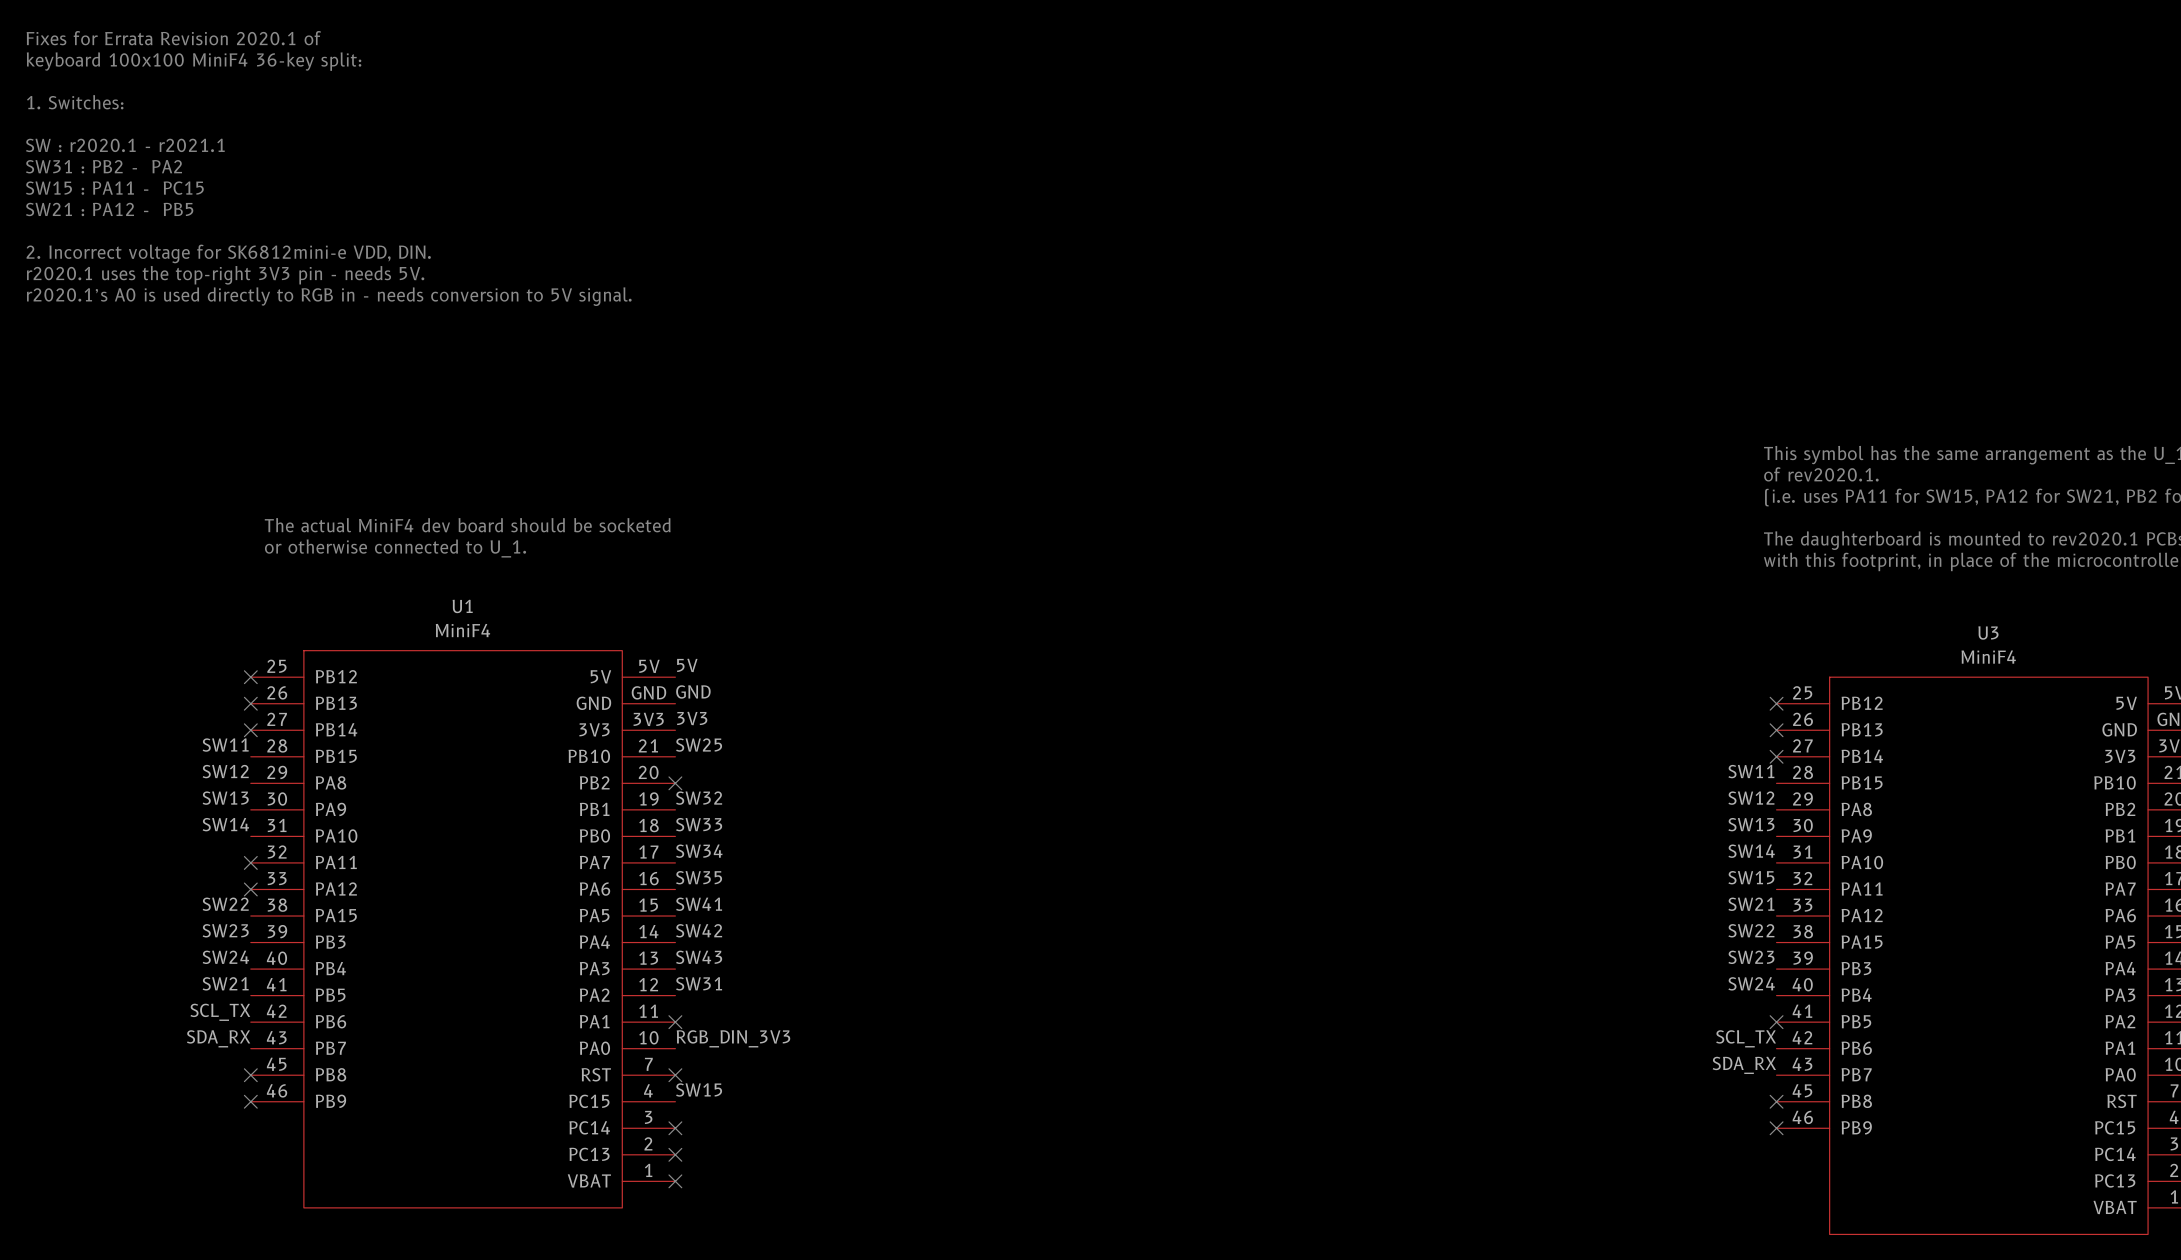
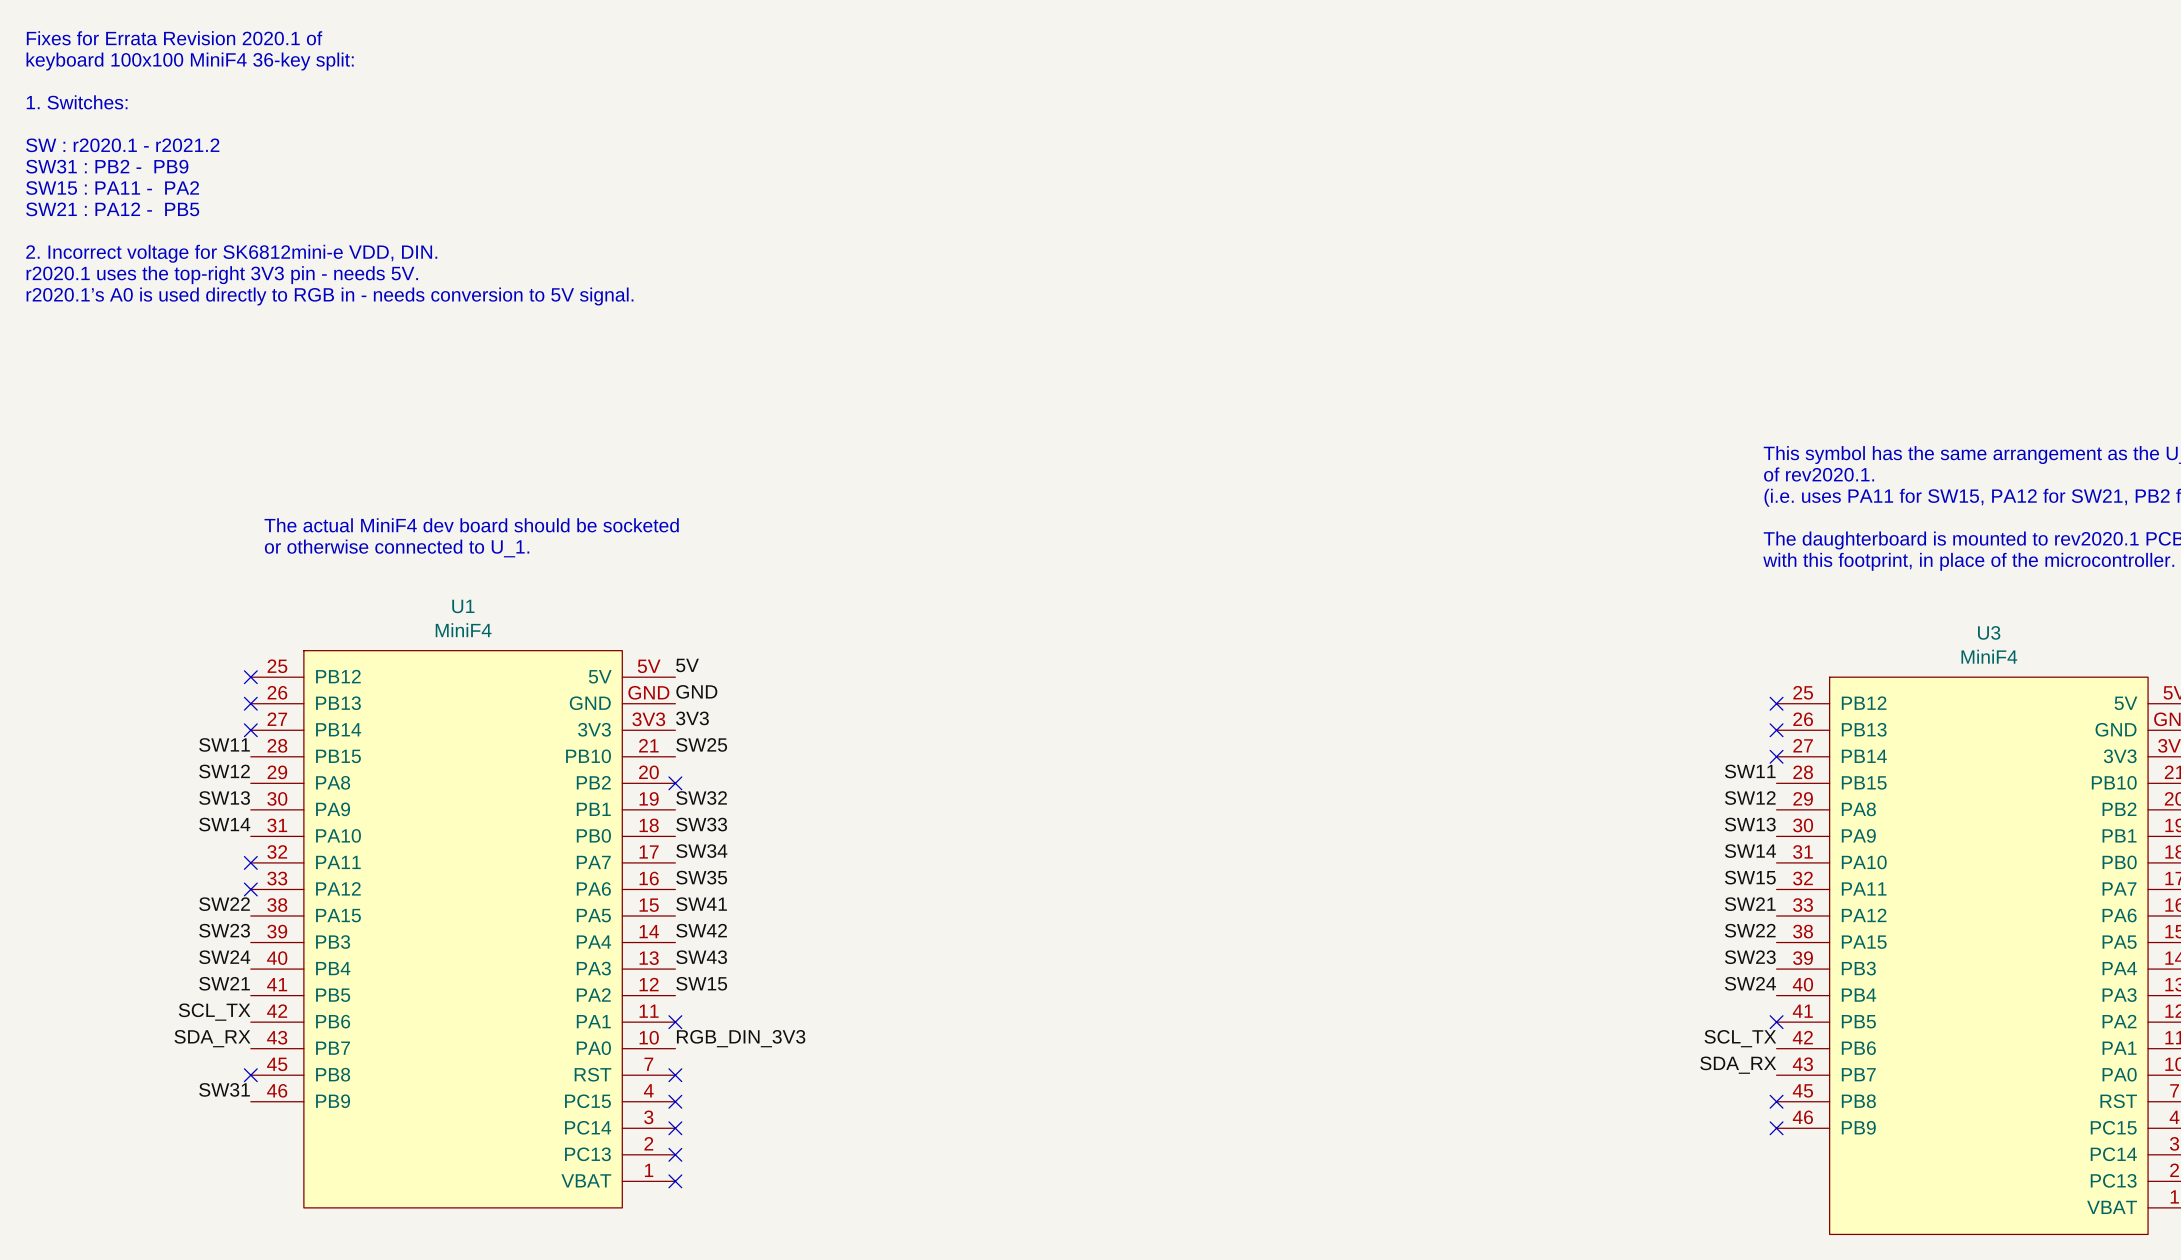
text: SW : r2020.1 - r2021.1 (125, 145) -> SW : r2020.1 - r2021.2 (122, 145)
text: SW31 : PB2 - PA2 (104, 166) -> SW31 : PB2 - PB9 (107, 166)
text: SW15 : PA11 - PC15 (114, 188) -> SW15 : PA11 - PA2 (112, 188)
label: SW31 (699, 983) -> SW15 (701, 983)
label: none -> SW31 (224, 1089)
label: SW15 (699, 1089) -> none
no-connect mark: (250, 1101) -> none
no-connect mark: none -> (675, 1101)

